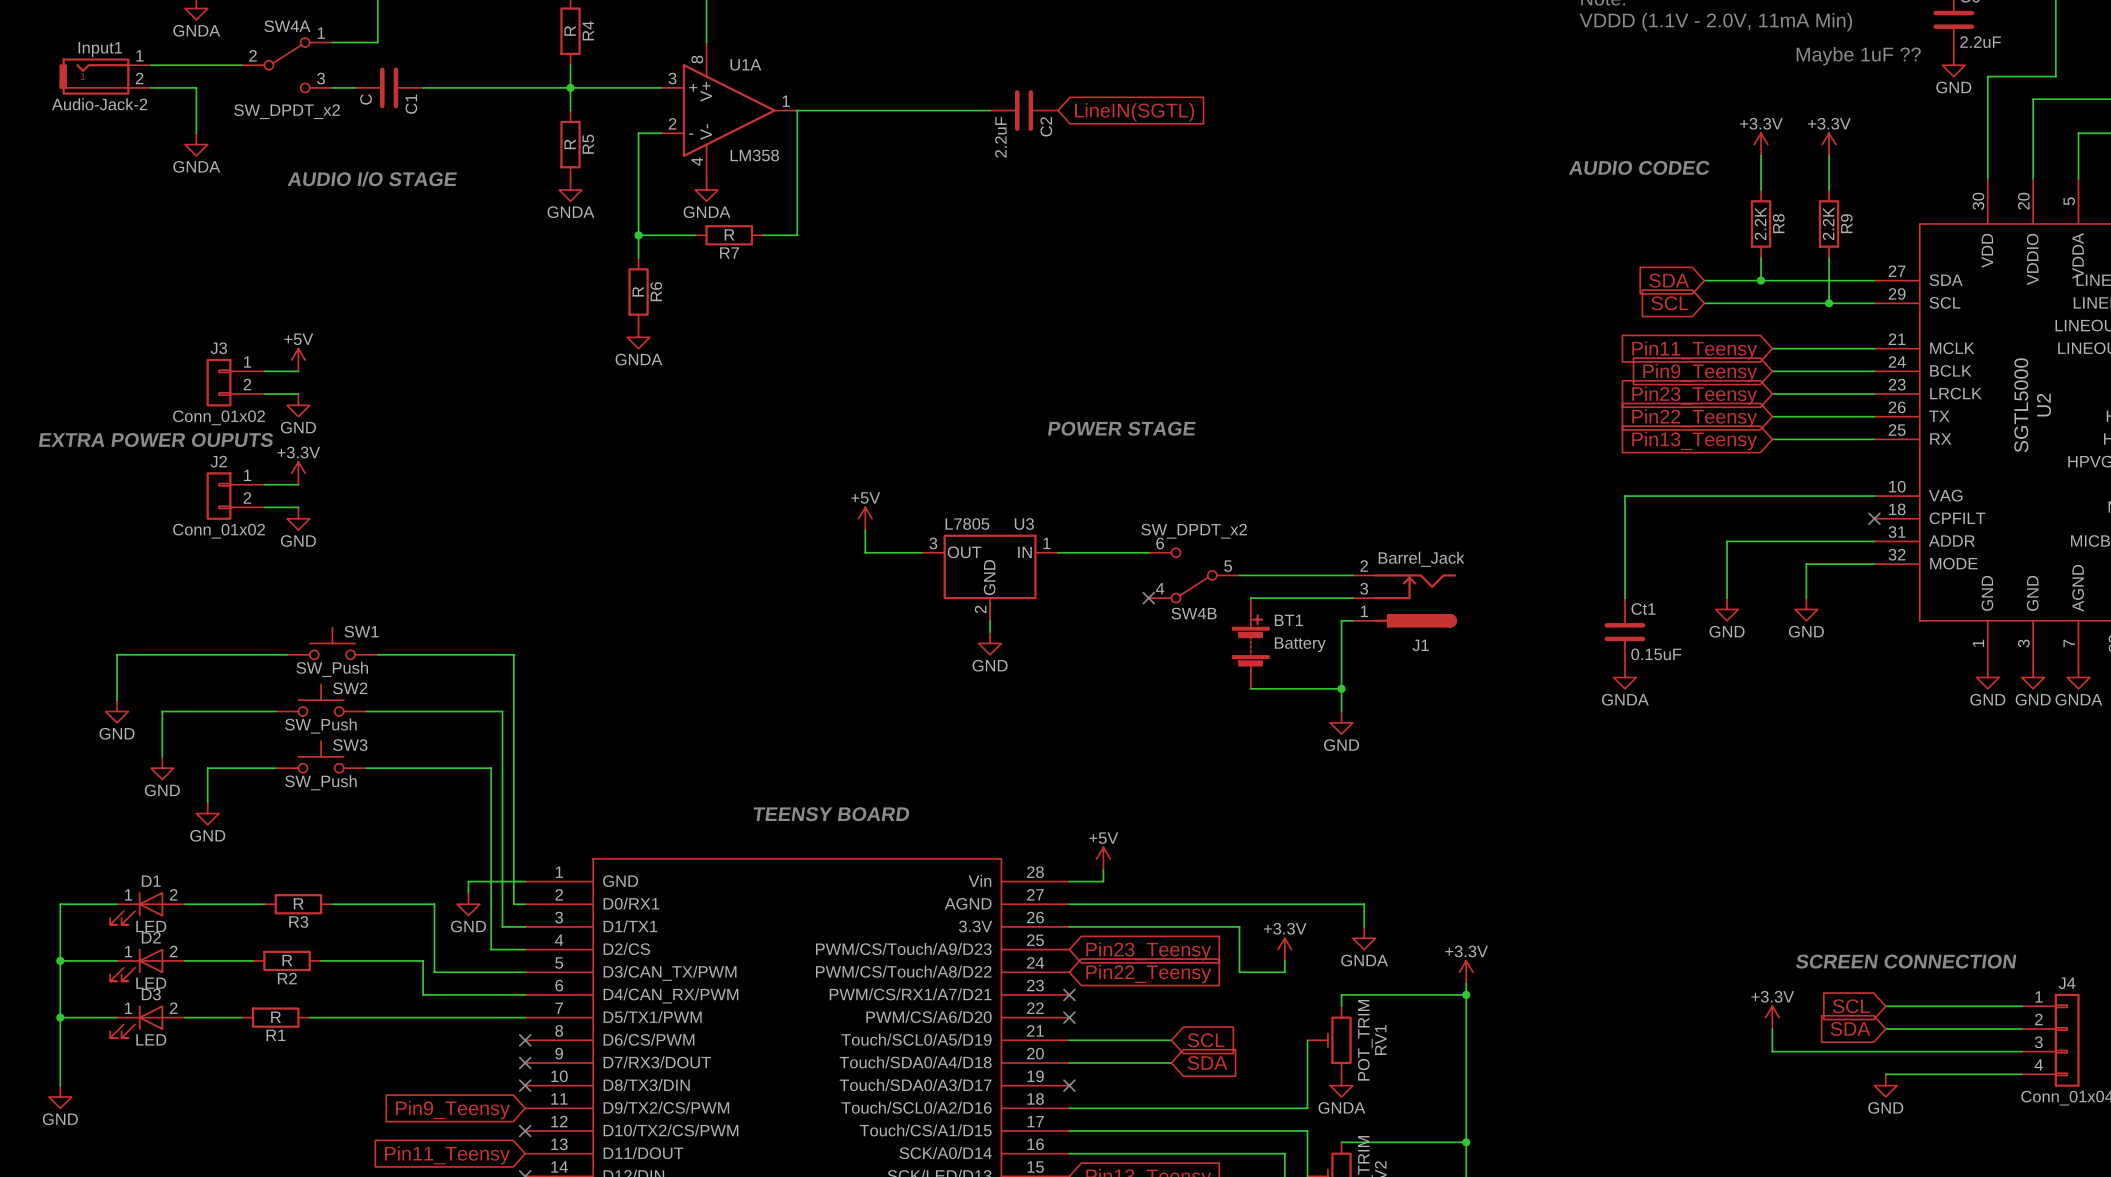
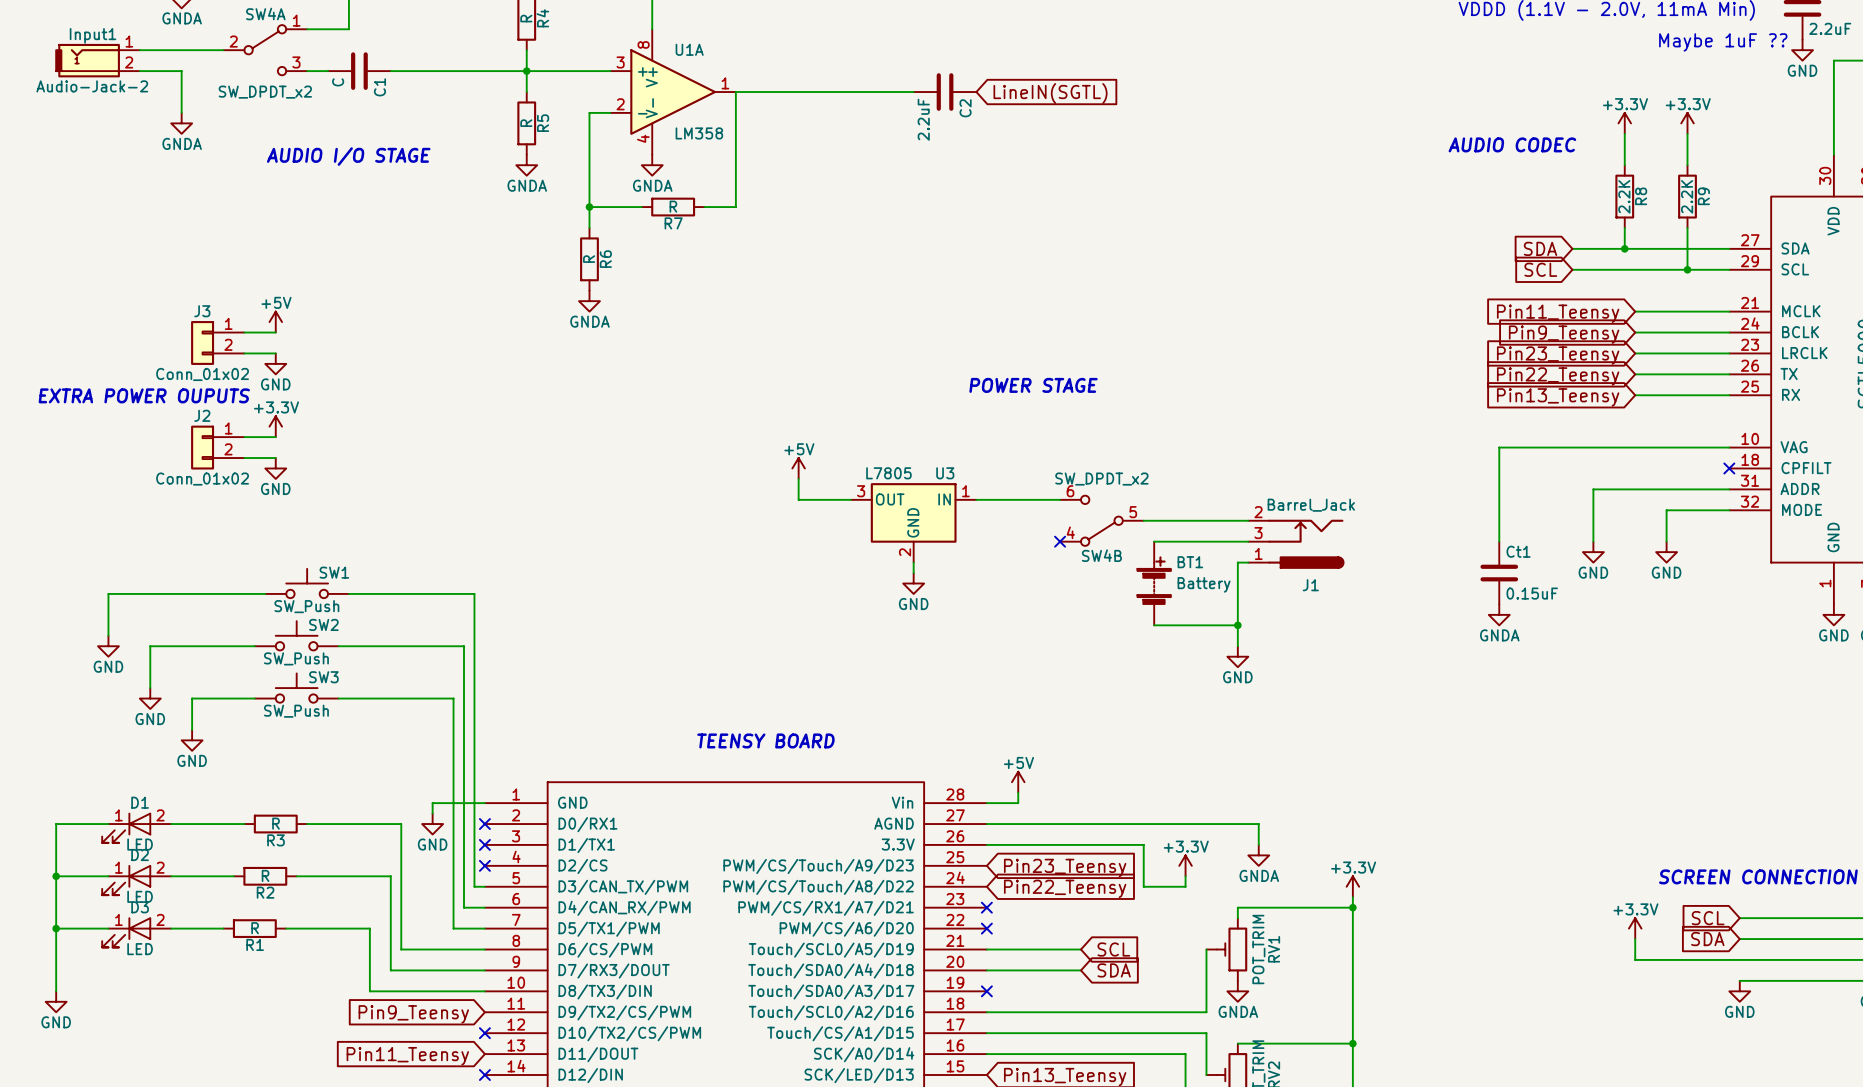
wire: (513, 904) (525, 904) -> (474, 824) (474, 886)
no-connect mark: none -> (484, 824)
wire: (502, 926) (525, 926) -> (464, 844) (464, 907)
no-connect mark: none -> (484, 844)
wire: (491, 949) (525, 949) -> (453, 865) (453, 928)
no-connect mark: none -> (484, 865)
wire: (434, 972) (513, 972) -> (401, 886) (401, 949) (484, 949)
wire: (423, 994) (502, 994) -> (390, 907) (390, 970) (484, 970)
wire: (400, 1017) (491, 1017) -> (369, 928) (369, 991) (484, 991)
no-connect mark: (525, 1040) -> none
no-connect mark: (525, 1062) -> none
no-connect mark: (525, 1085) -> none

